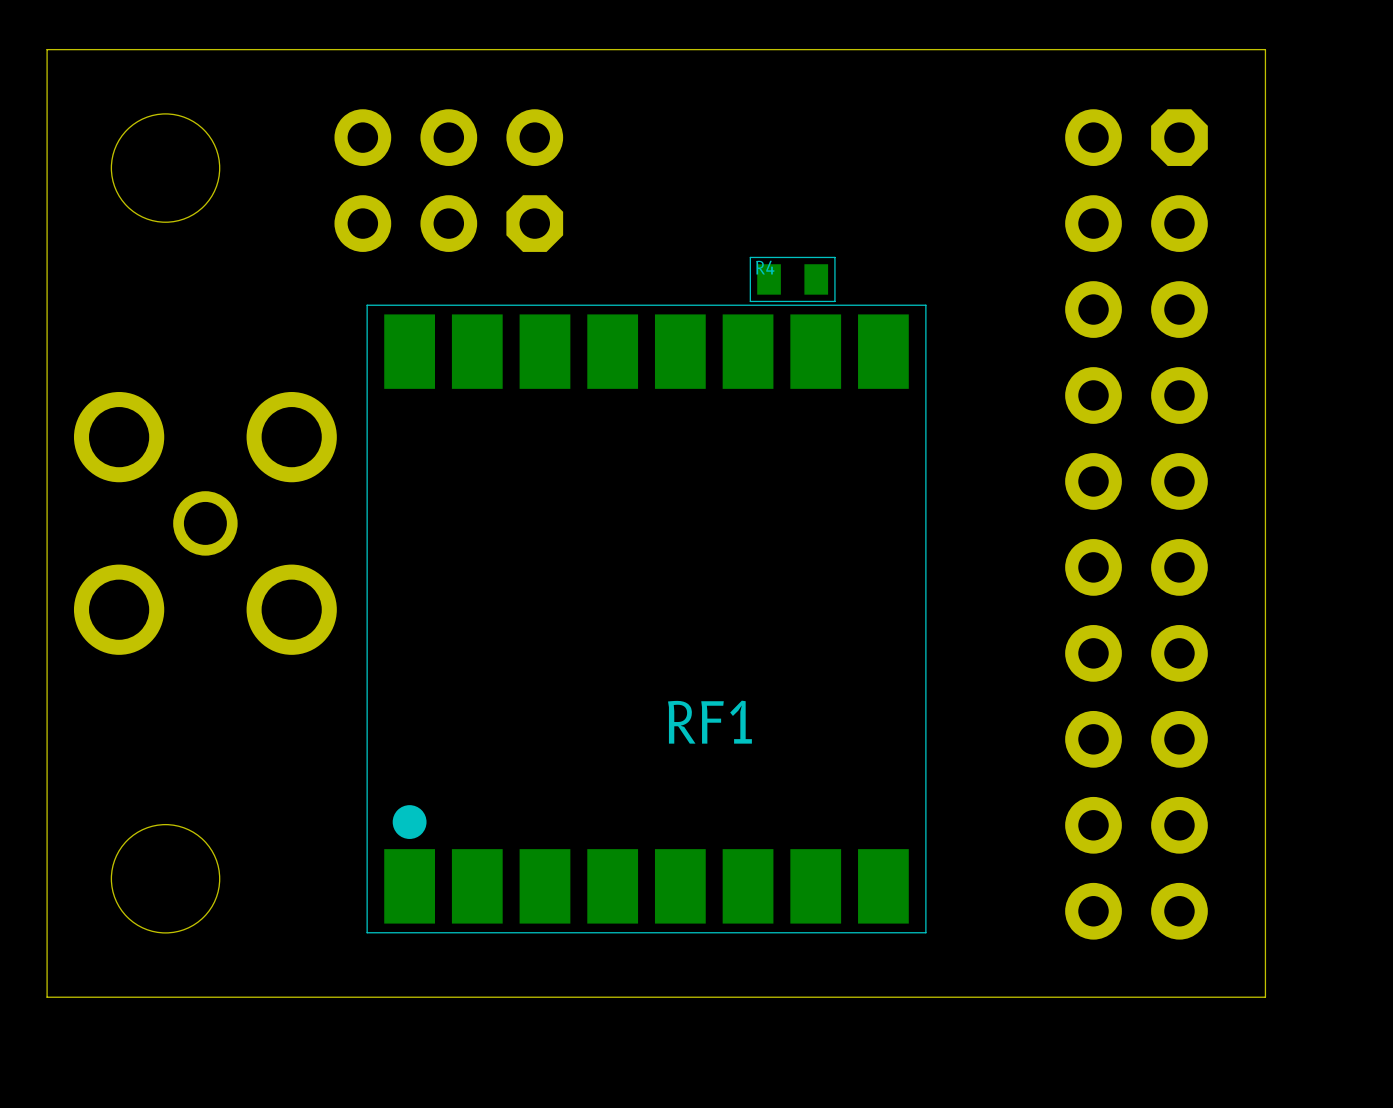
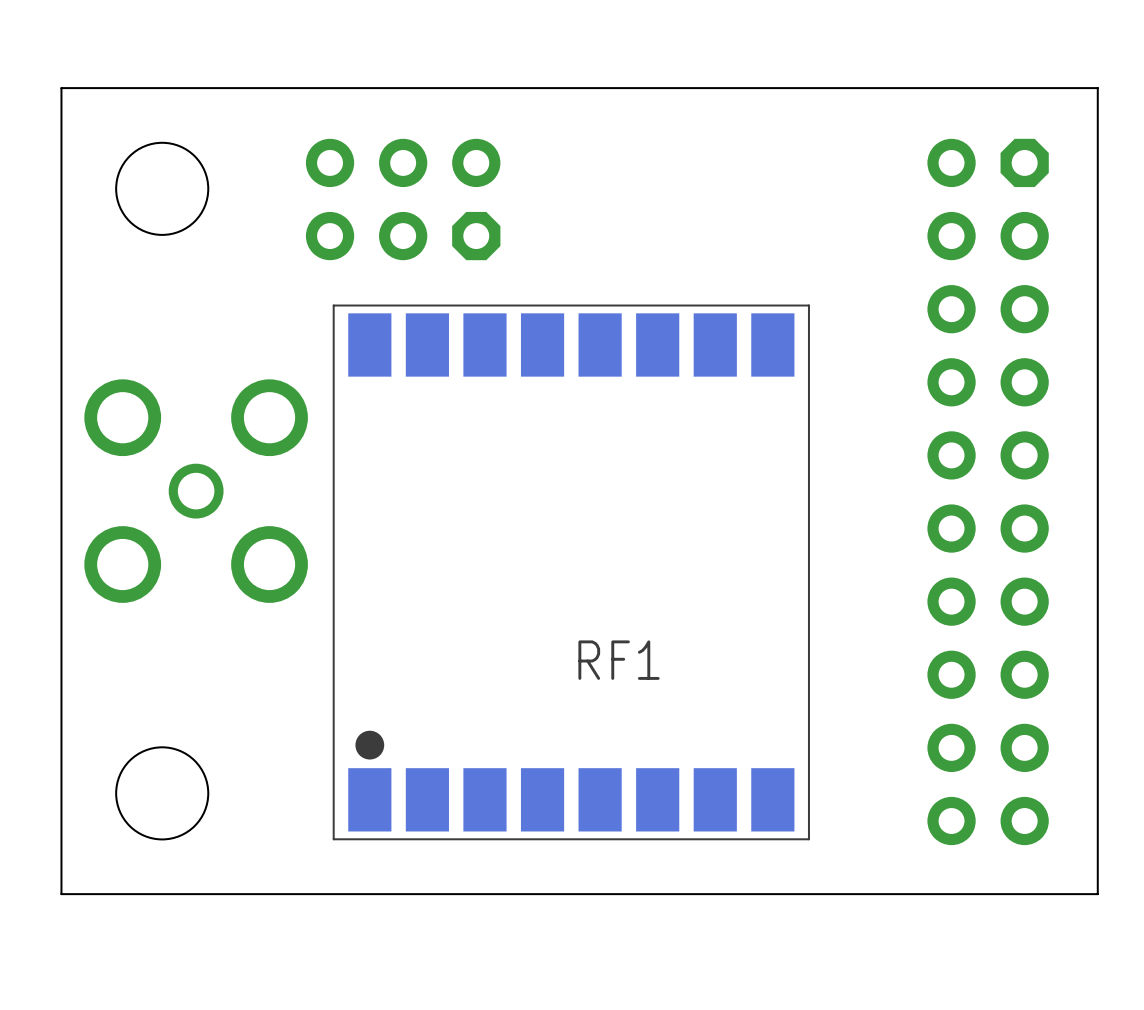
R4: (792, 279) -> none

